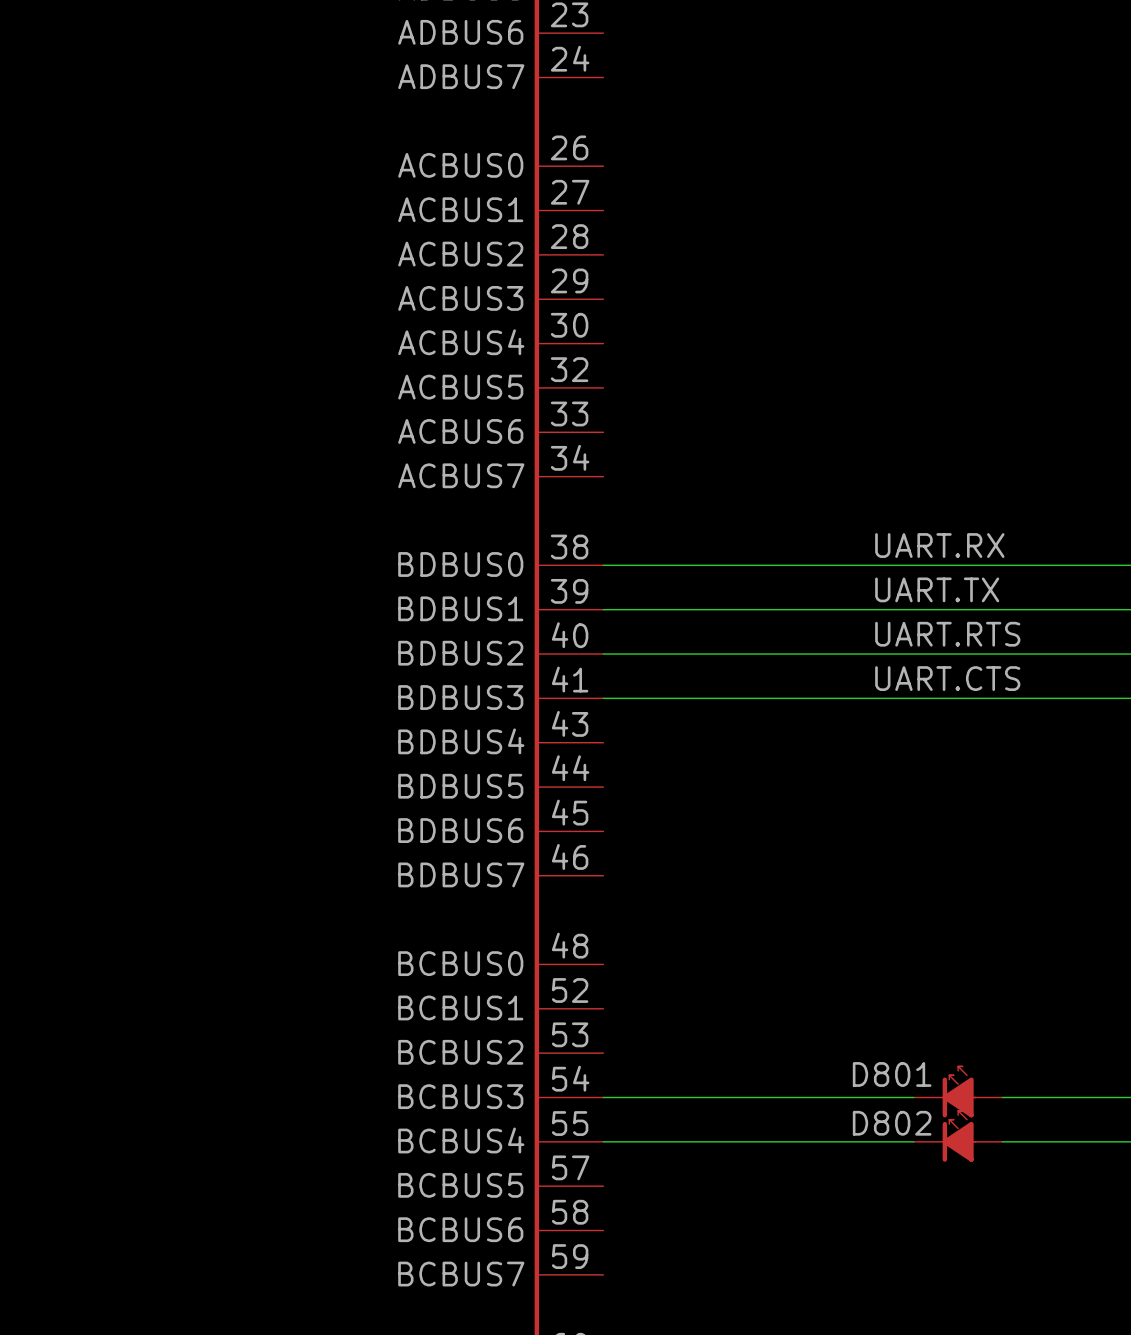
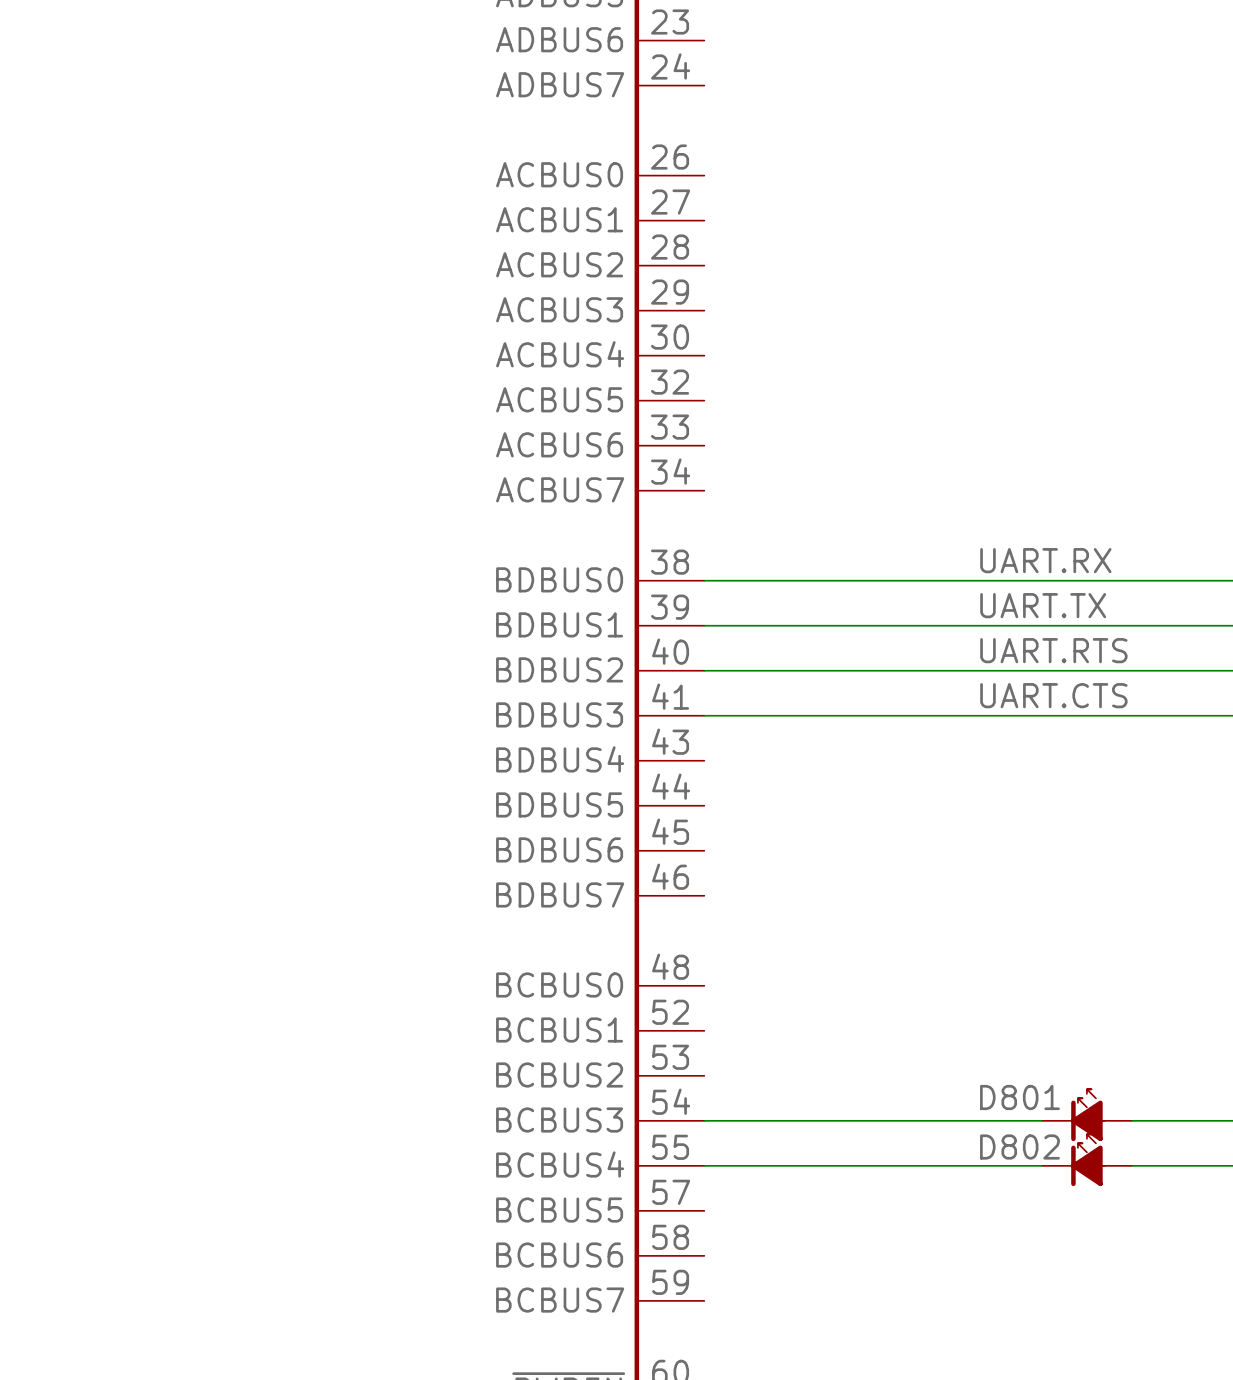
D801 position: (958, 1091) -> (1086, 1115)
D802 position: (958, 1136) -> (1086, 1160)

